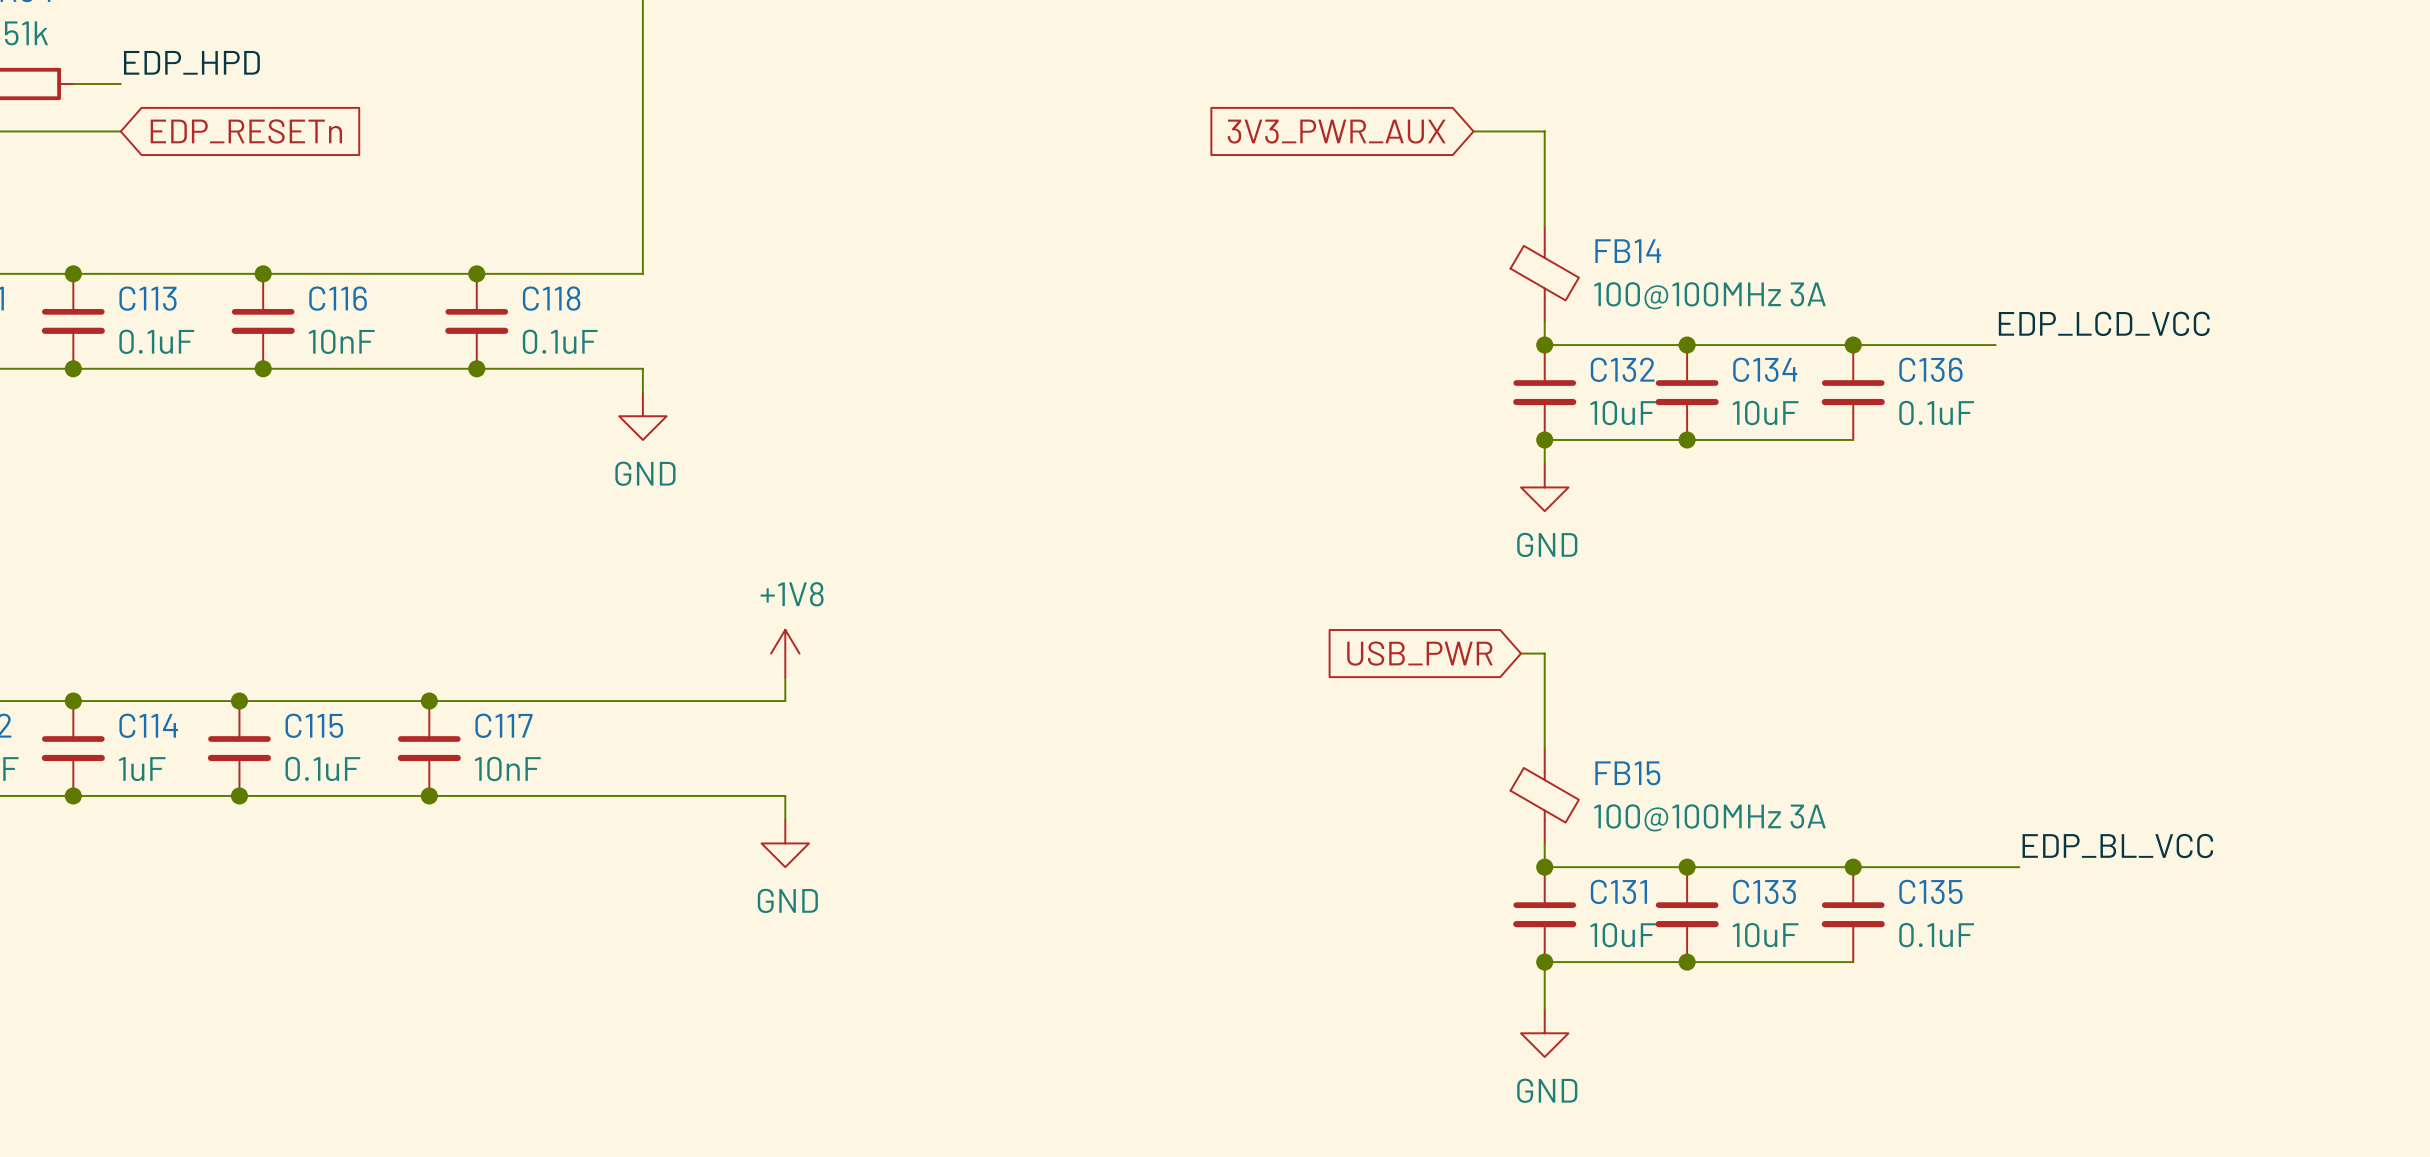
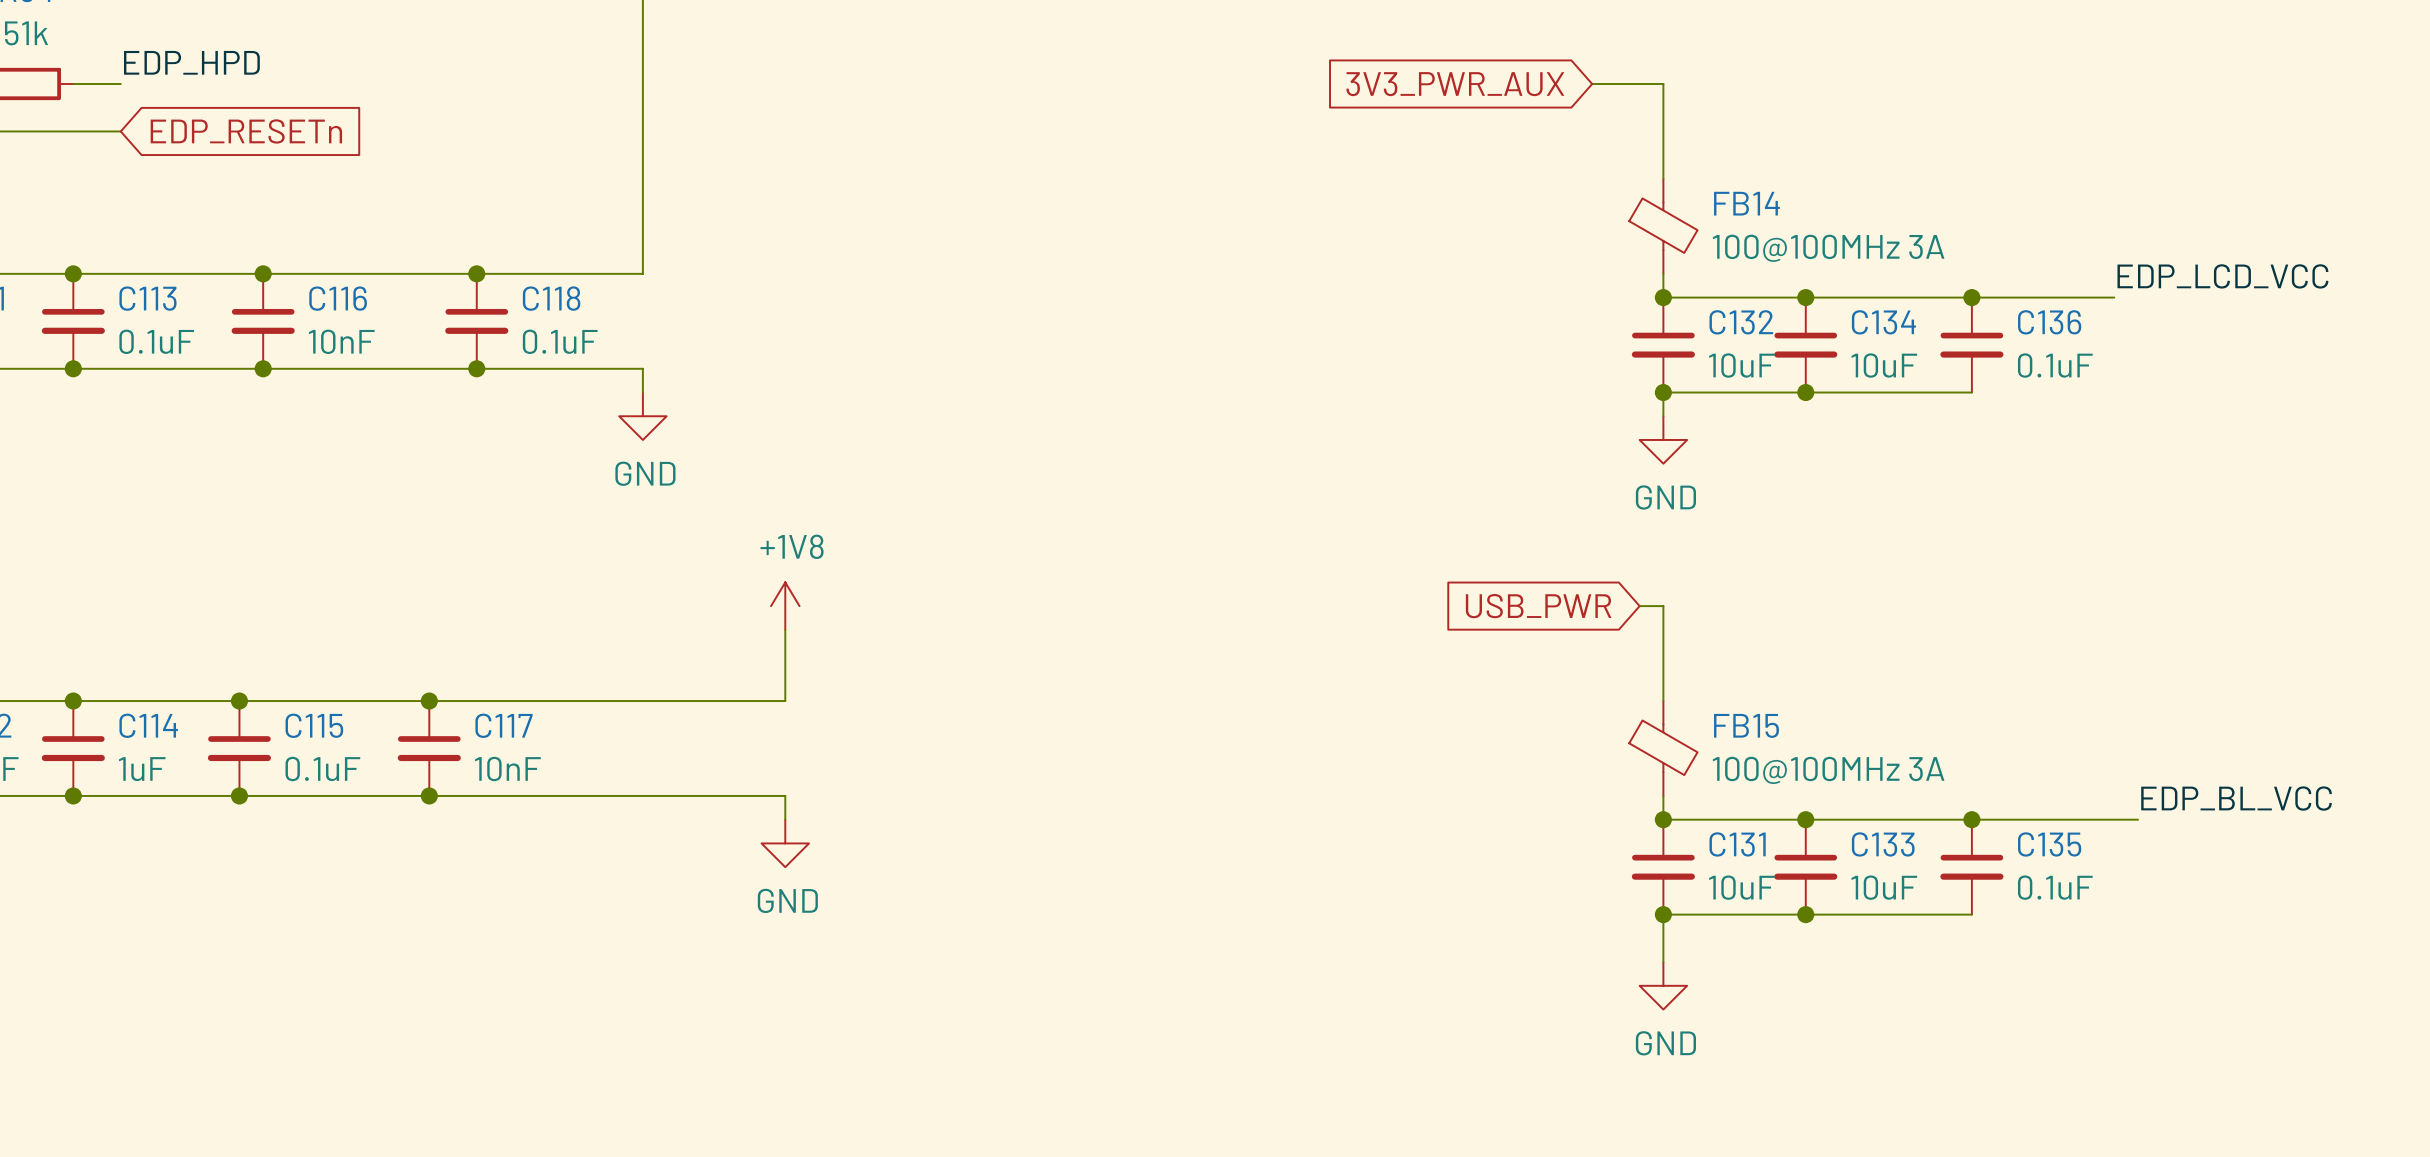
global label position: 3V3_PWR_AUX (1336, 131) -> 3V3_PWR_AUX (1455, 84)
wire: (1473, 131) (1544, 131) (1544, 226) -> (1592, 83) (1663, 83) (1663, 178)
FB14 position: (1544, 273) -> (1663, 226)
junction: none -> (1663, 297)
junction: none -> (1805, 297)
junction: none -> (1971, 297)
wire: (1544, 321) (1544, 345) (1995, 345) -> (1663, 273) (1663, 297) (2114, 297)
label position: EDP_LCD_VCC (2104, 323) -> EDP_LCD_VCC (2222, 276)
junction: (1544, 345) -> none
junction: (1687, 345) -> none
junction: (1853, 345) -> none
C132 position: (1544, 392) -> (1663, 345)
junction: none -> (1663, 392)
C134 position: (1687, 392) -> (1805, 345)
junction: none -> (1805, 392)
C136 position: (1853, 392) -> (1971, 345)
junction: (1544, 439) -> none
junction: (1687, 439) -> none
wire: (1853, 439) (1544, 439) (1544, 463) -> (1971, 392) (1663, 392) (1663, 416)
power symbol position: GND (1544, 487) -> GND (1663, 439)
power symbol position: +1V8 (785, 653) -> +1V8 (785, 606)
global label position: USB_PWR (1419, 653) -> USB_PWR (1538, 606)
wire: (1520, 653) (1544, 653) (1544, 748) -> (1639, 606) (1663, 606) (1663, 701)
FB15 position: (1544, 795) -> (1663, 748)
junction: none -> (1663, 819)
junction: none -> (1805, 819)
junction: none -> (1971, 819)
wire: (1544, 843) (1544, 867) (2019, 867) -> (1663, 795) (1663, 819) (2138, 819)
label position: EDP_BL_VCC (2117, 846) -> EDP_BL_VCC (2236, 798)
junction: (1544, 867) -> none
junction: (1687, 867) -> none
junction: (1853, 867) -> none
C131 position: (1544, 914) -> (1663, 867)
junction: none -> (1663, 914)
C133 position: (1687, 914) -> (1805, 867)
junction: none -> (1805, 914)
C135 position: (1853, 914) -> (1971, 867)
junction: (1544, 962) -> none
junction: (1687, 962) -> none
wire: (1853, 962) (1544, 962) (1544, 1009) -> (1971, 914) (1663, 914) (1663, 962)
power symbol position: GND (1544, 1033) -> GND (1663, 985)

